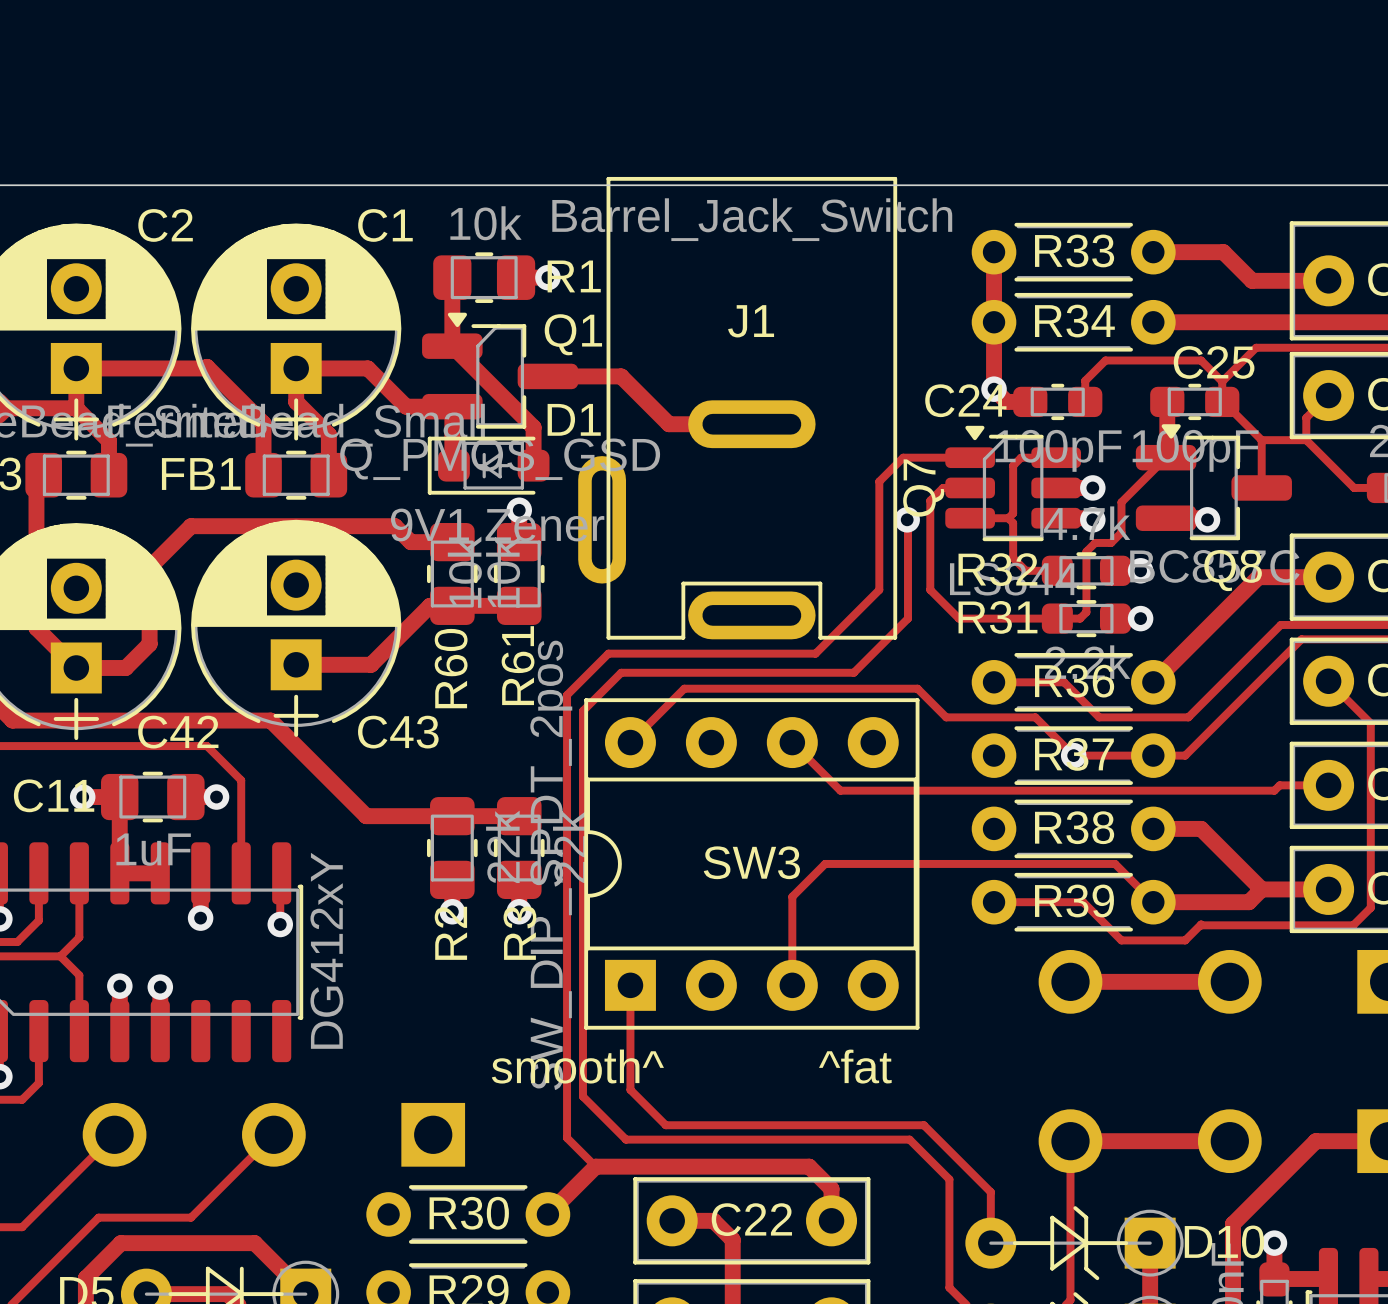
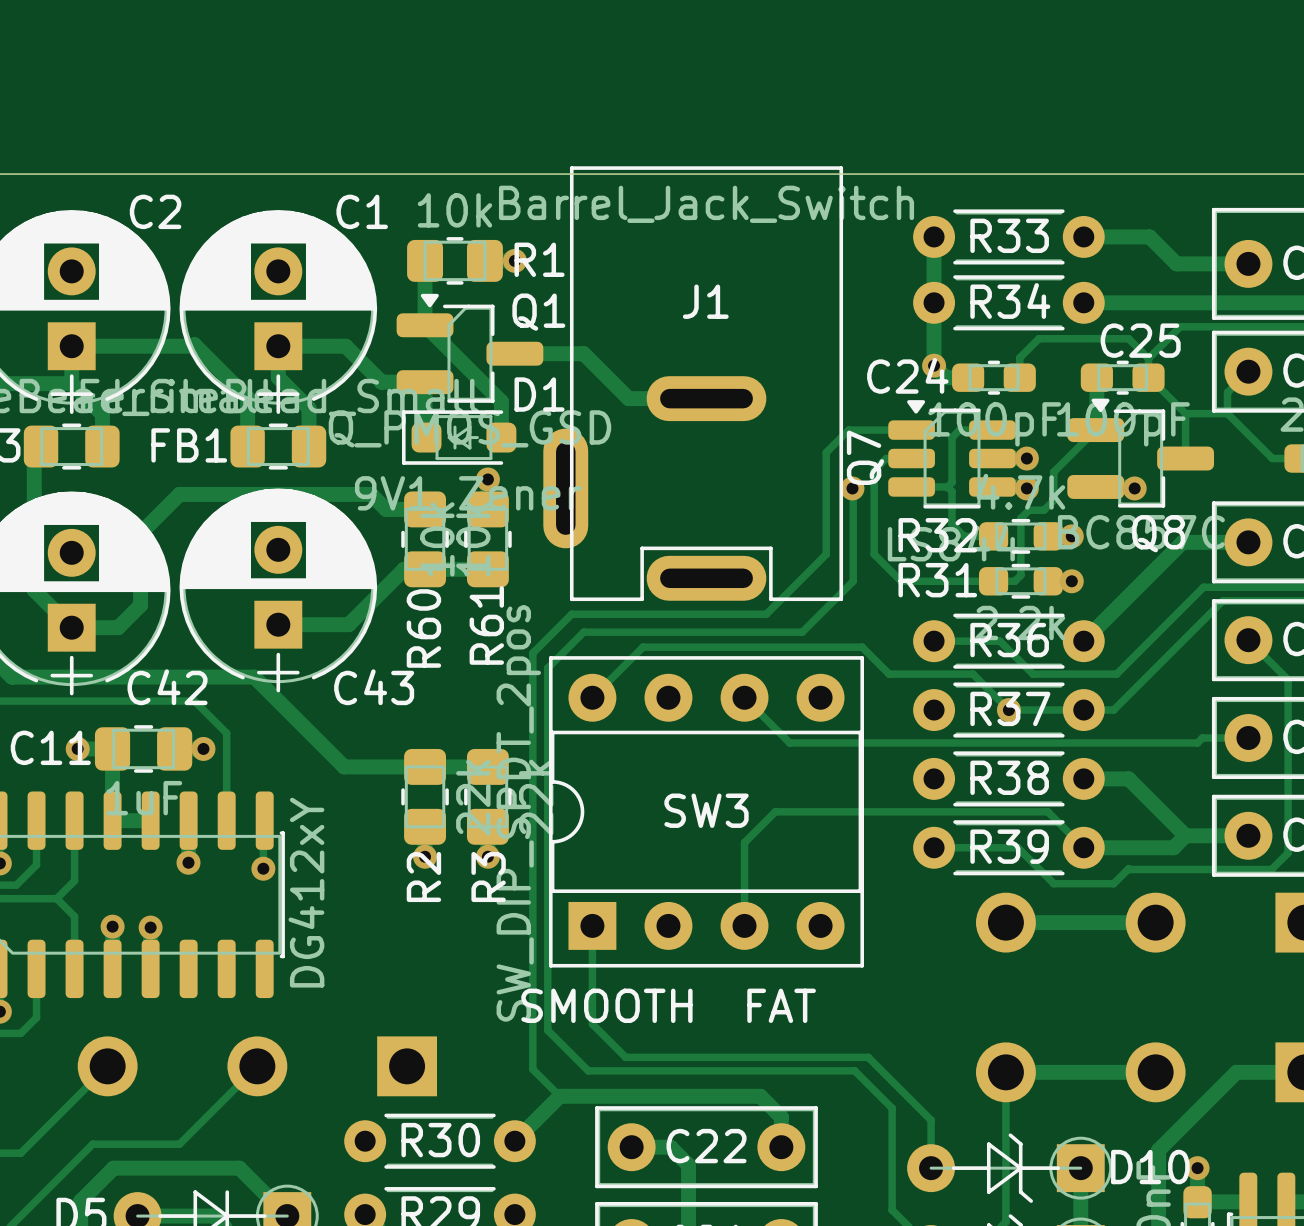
text: smooth^ (577, 1066) -> none
text: ^fat (855, 1066) -> none
text: none -> SMOOTH (606, 1005)
text: none -> FAT (781, 1005)

